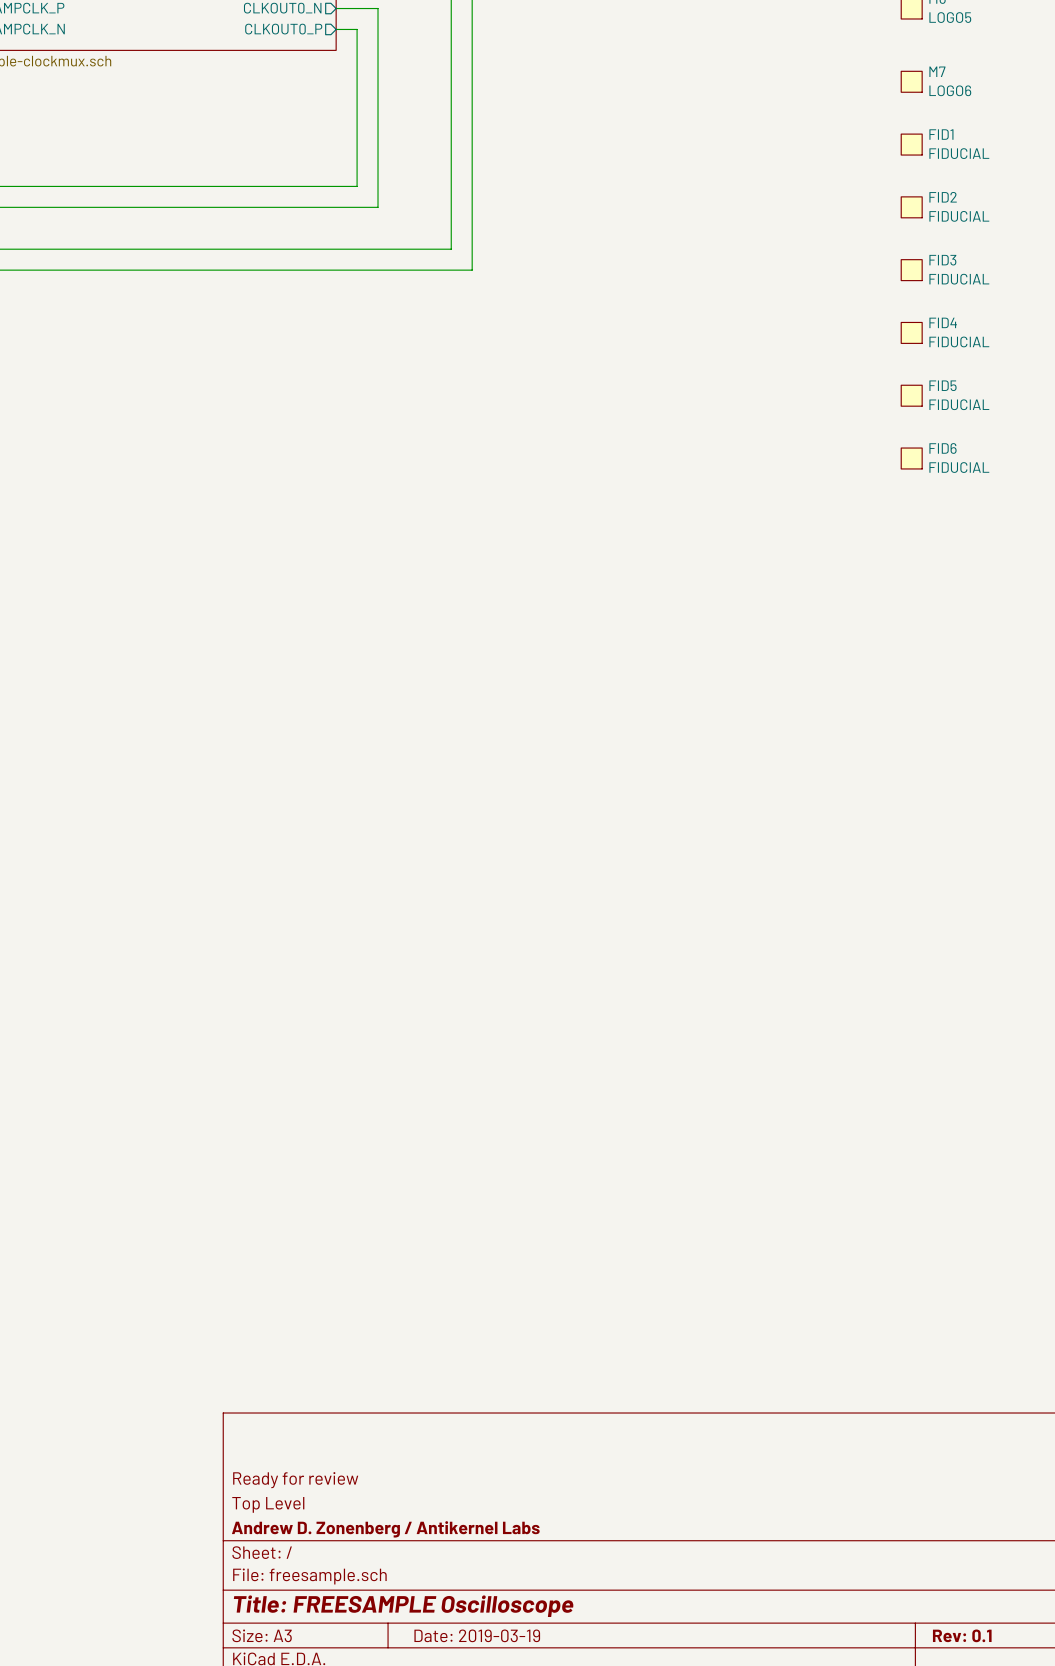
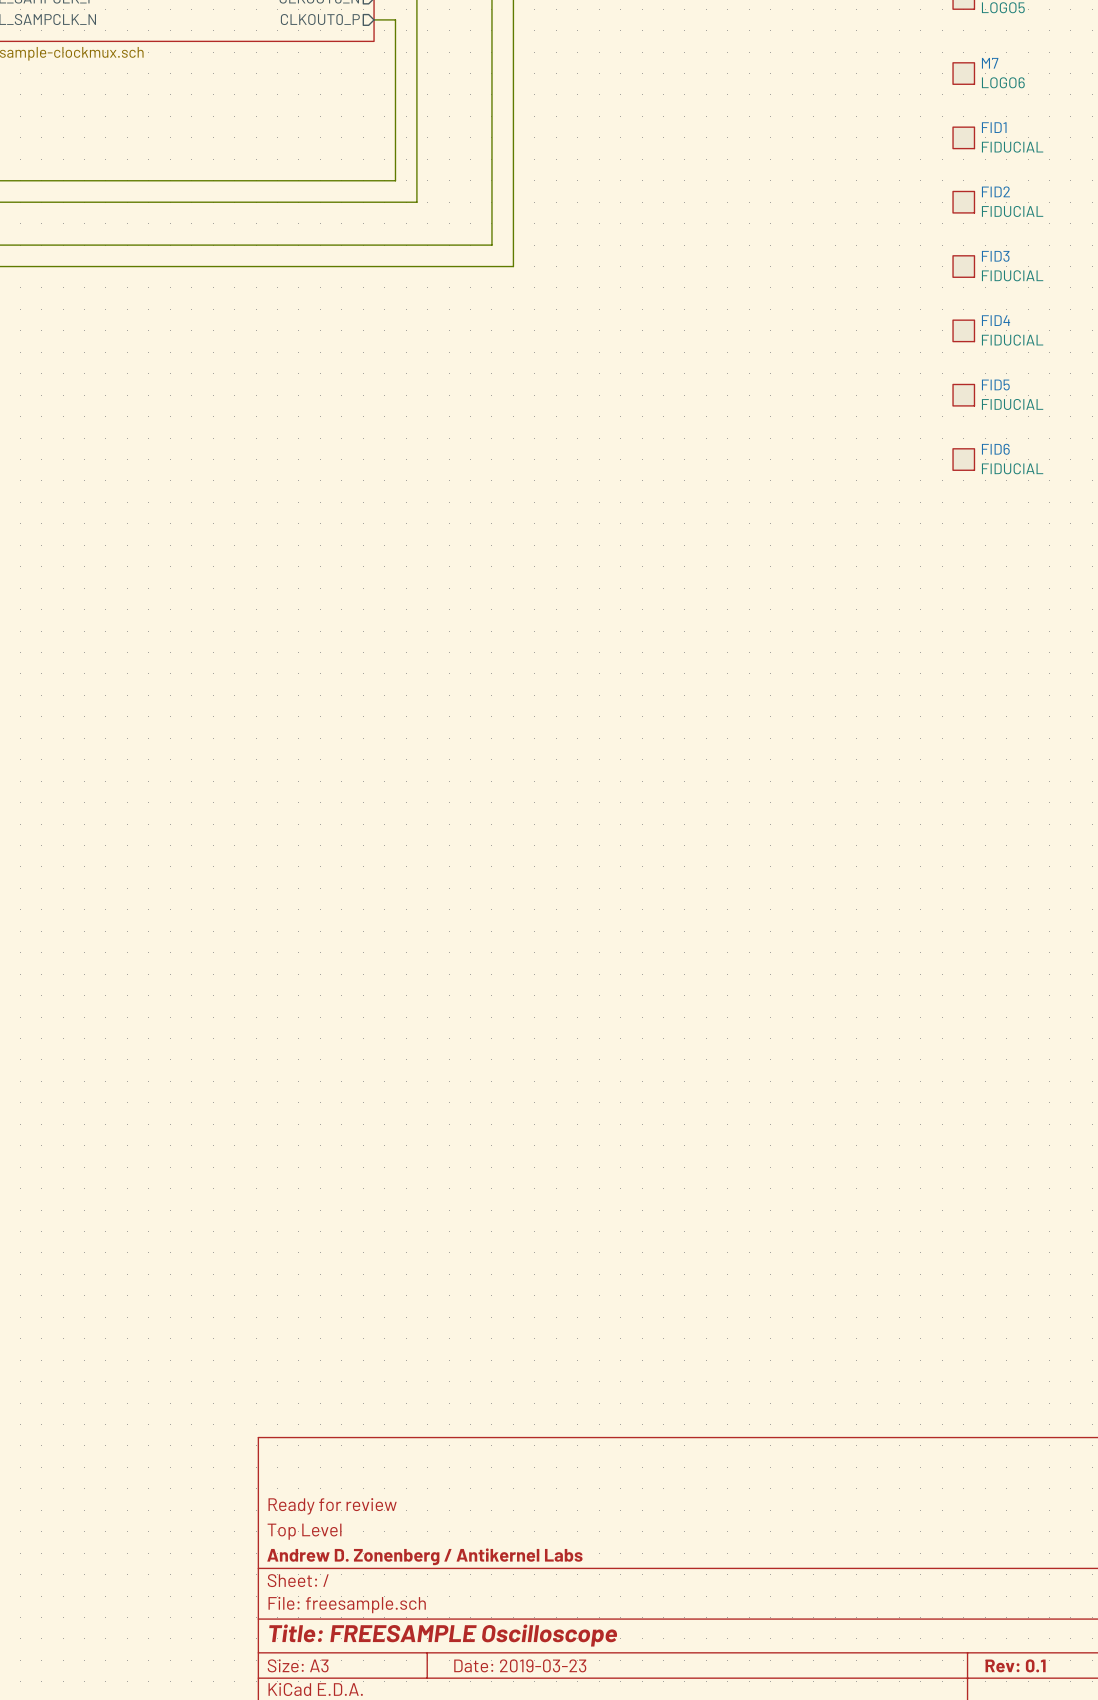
title block: Date: 2019-03-19 (477, 1635) -> Date: 2019-03-23 (520, 1665)

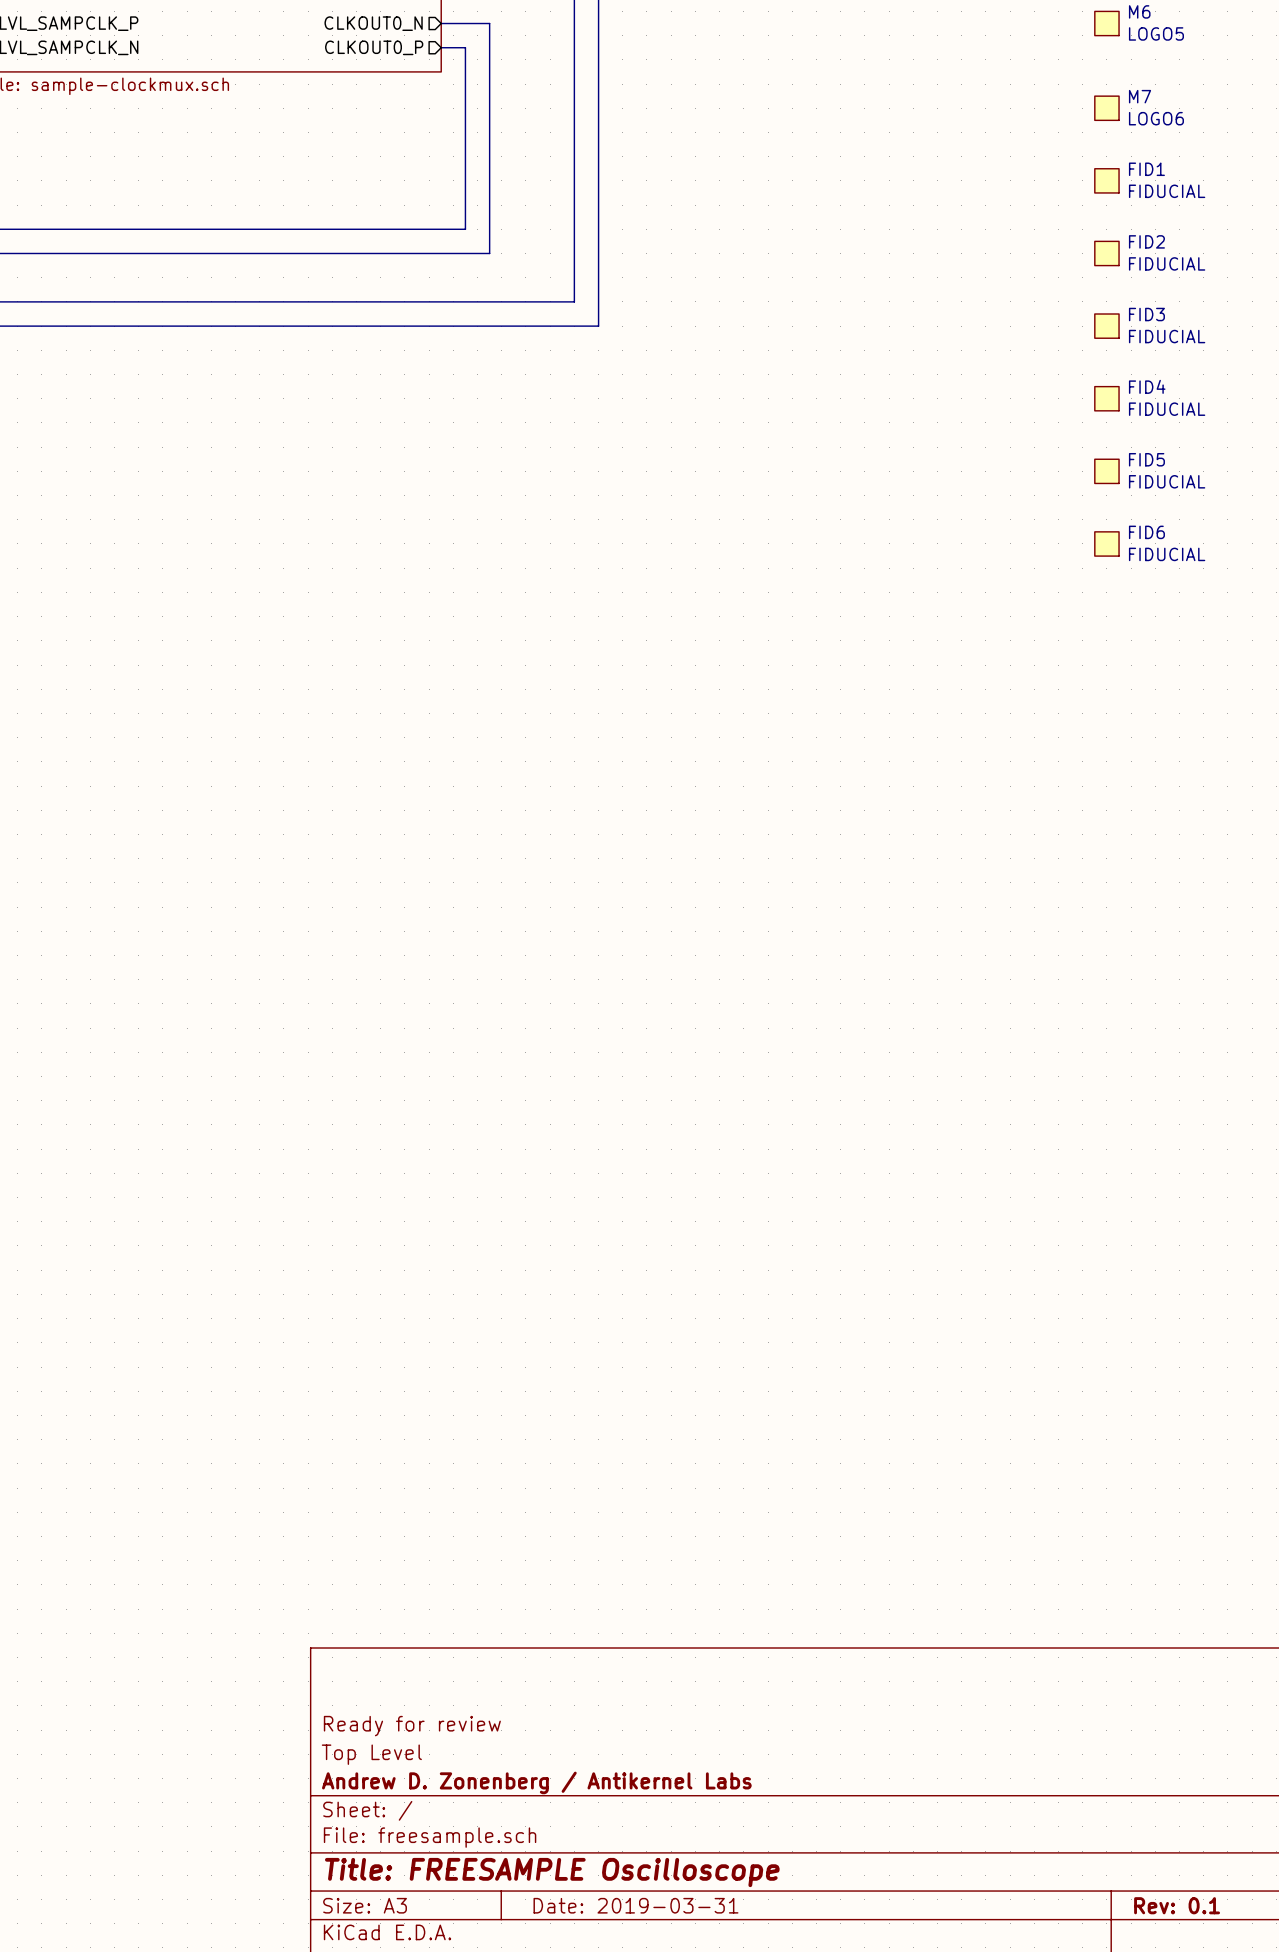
title block: Date: 2019-03-23 (520, 1665) -> Date: 2019-03-31 (635, 1905)

